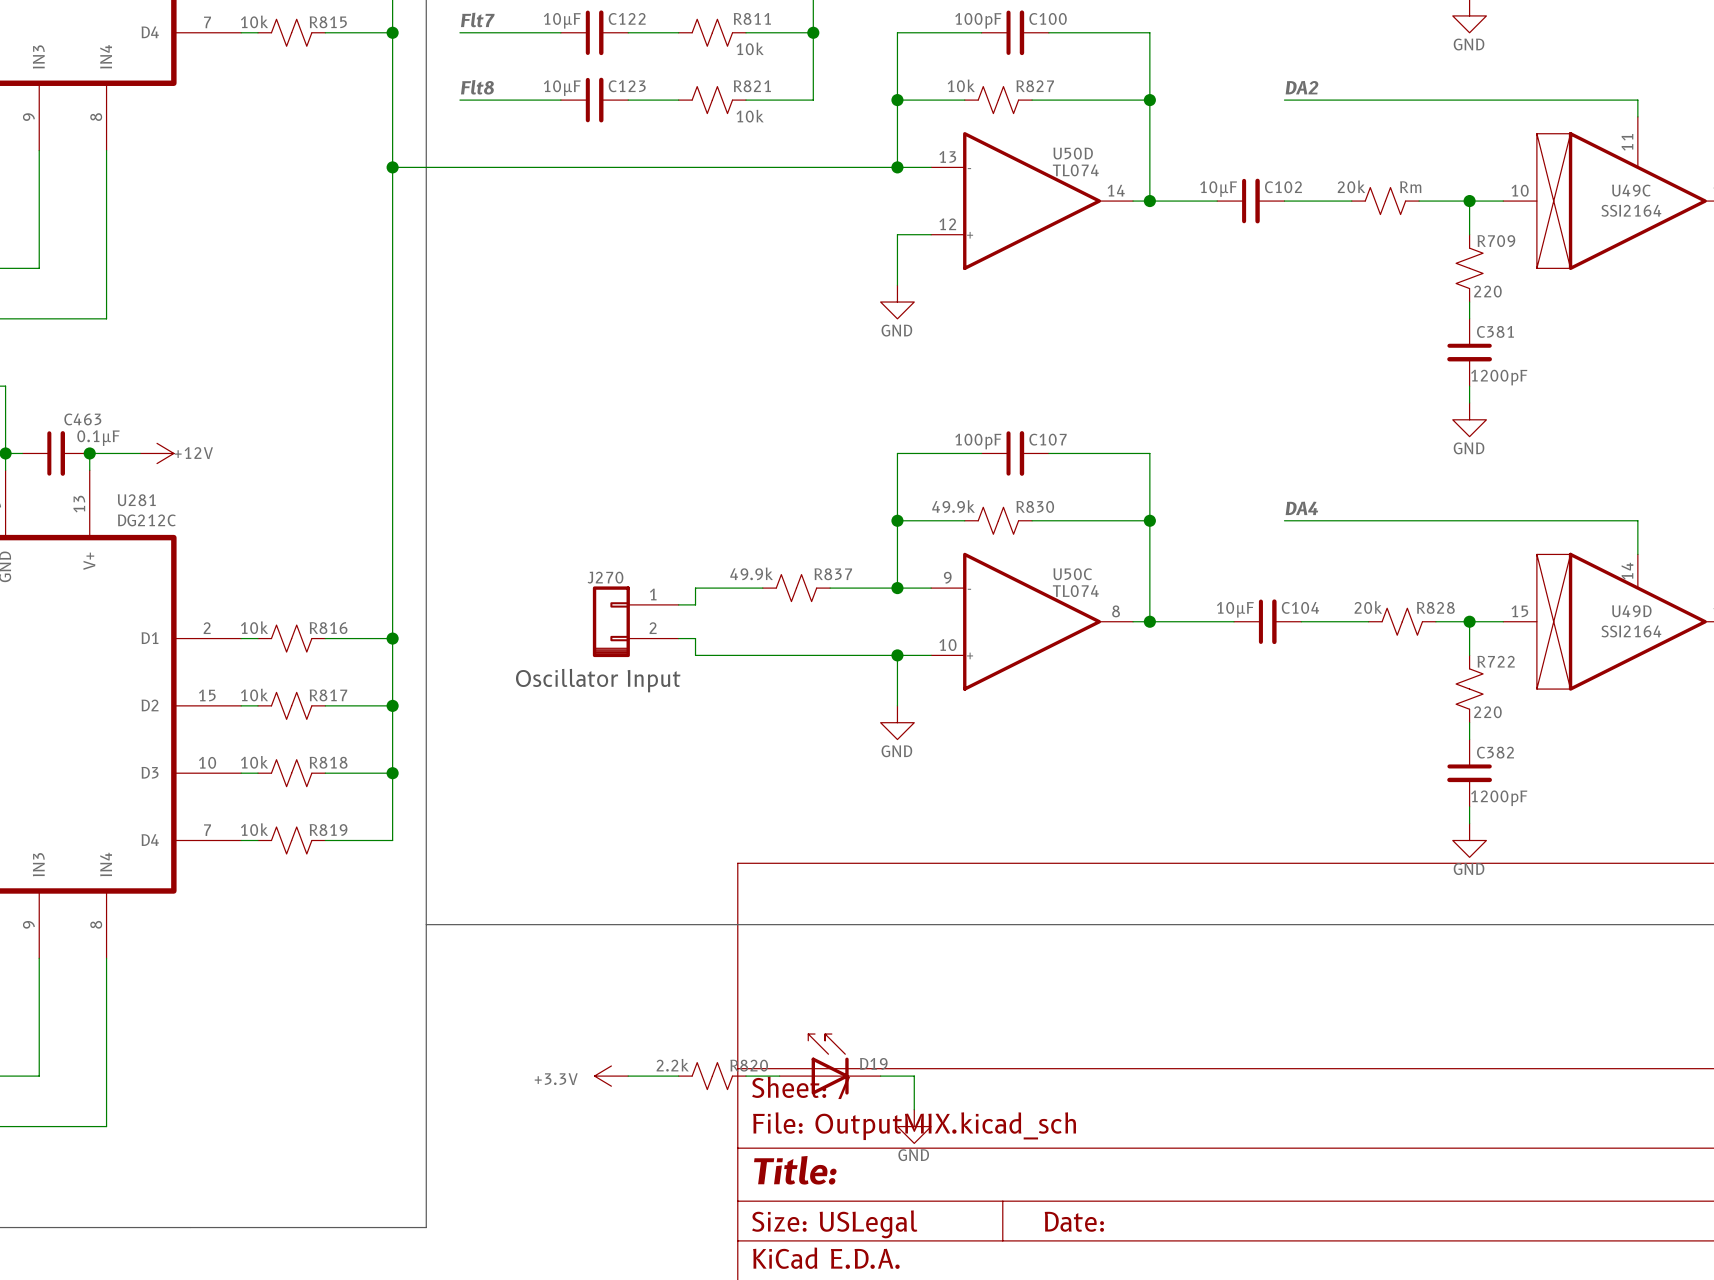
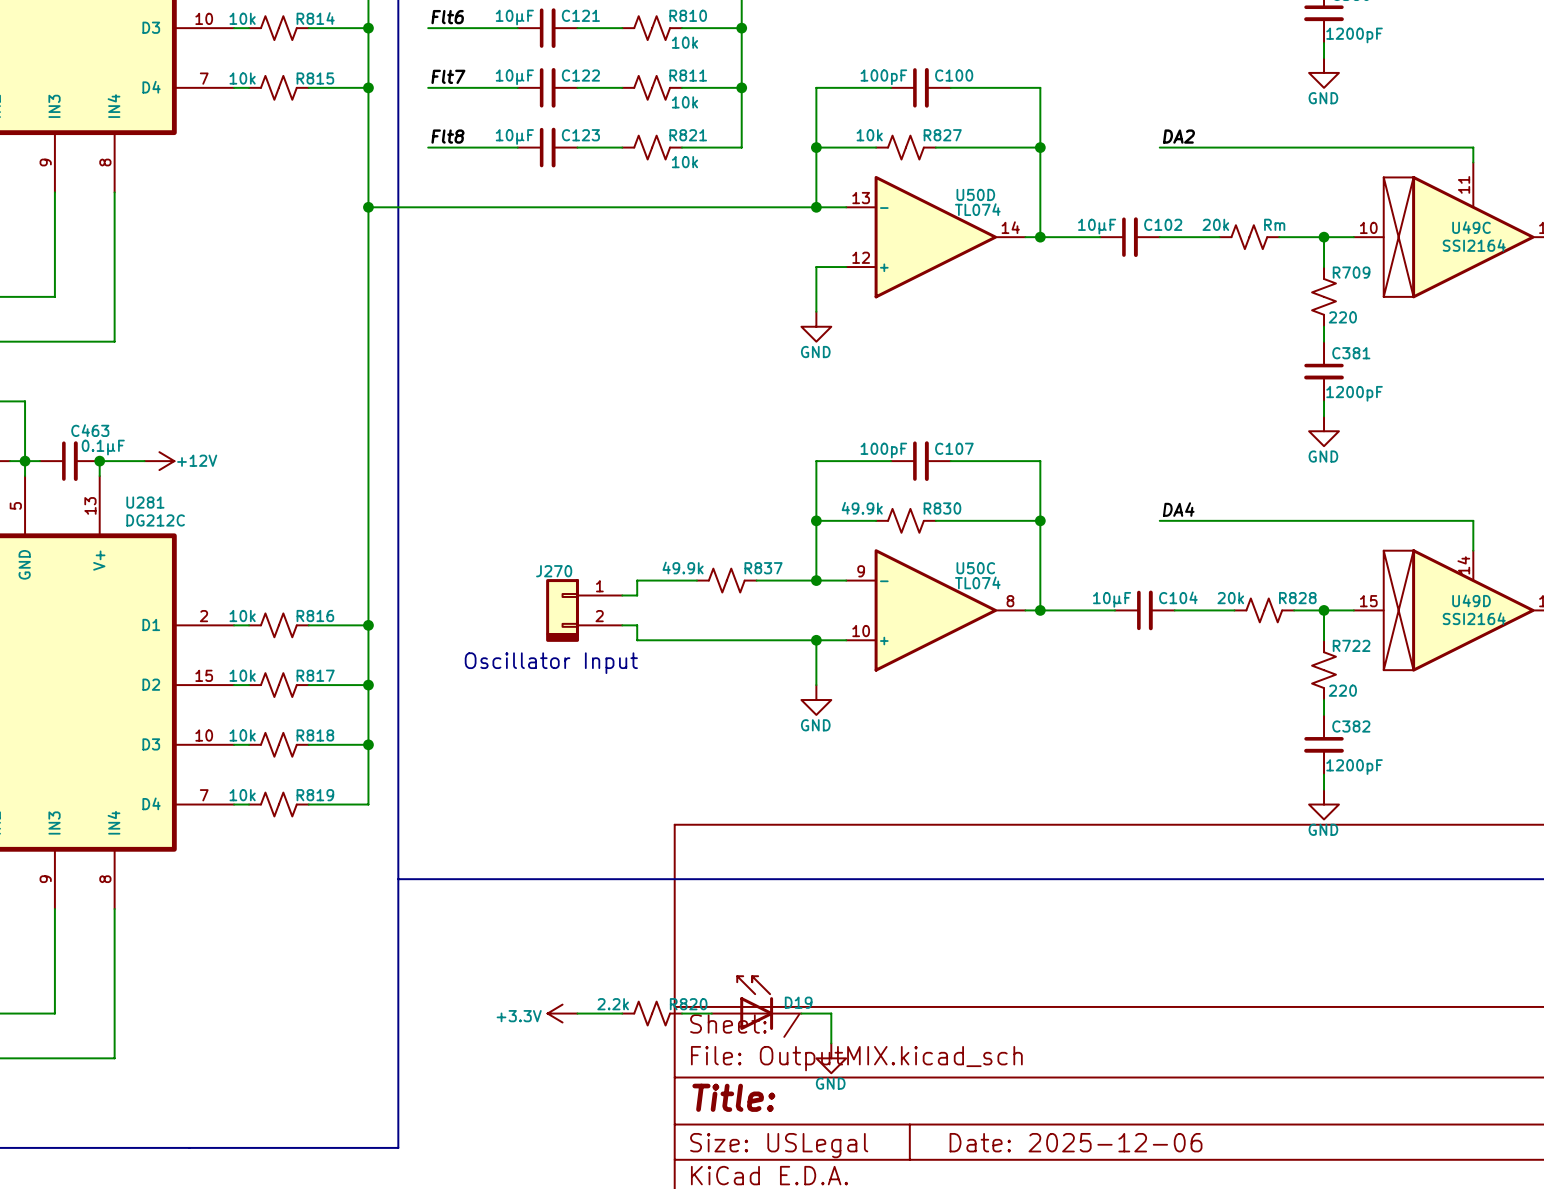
title block: Date: (1074, 1221) -> Date: 2025-12-06 (1076, 1142)

